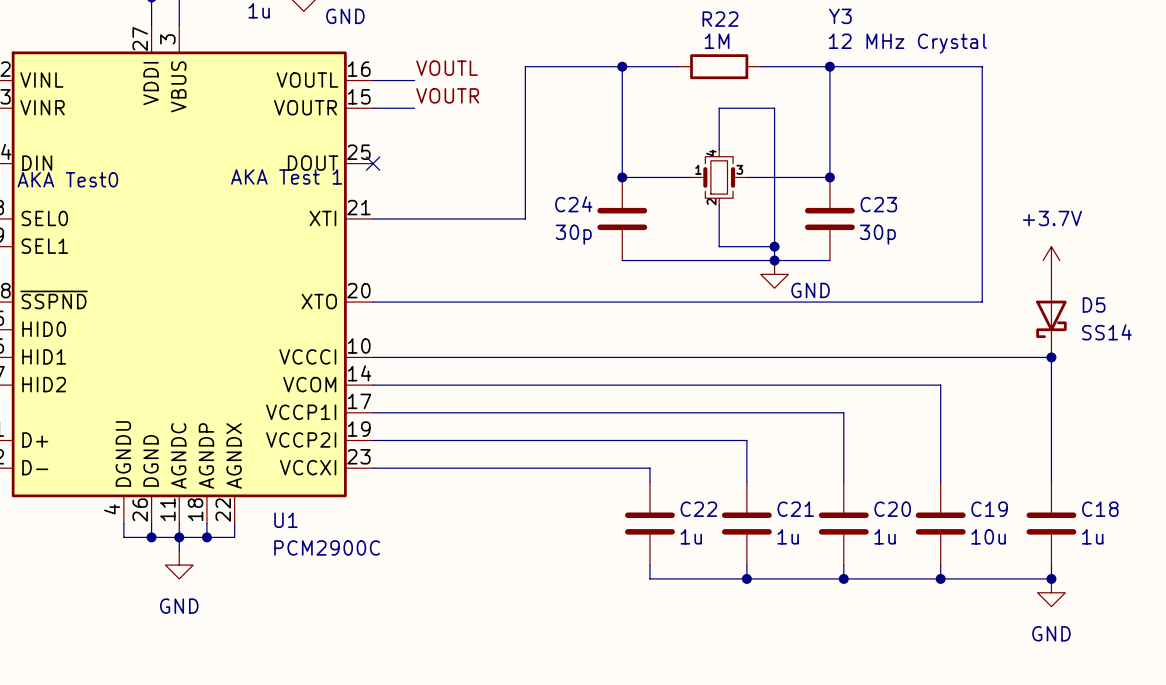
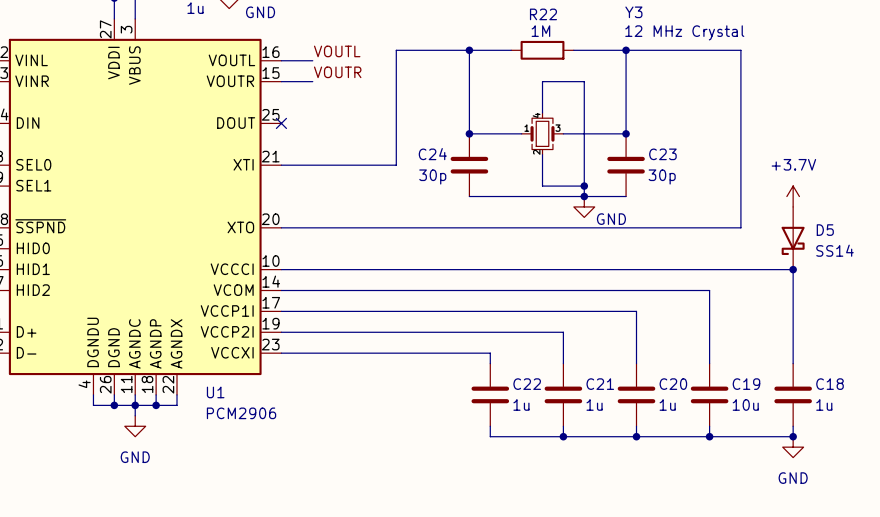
text: AKA Test 1 (286, 176) -> none
text: AKA Test0 (67, 179) -> none
U1 value: PCM2900C (327, 547) -> PCM2906 (241, 413)

